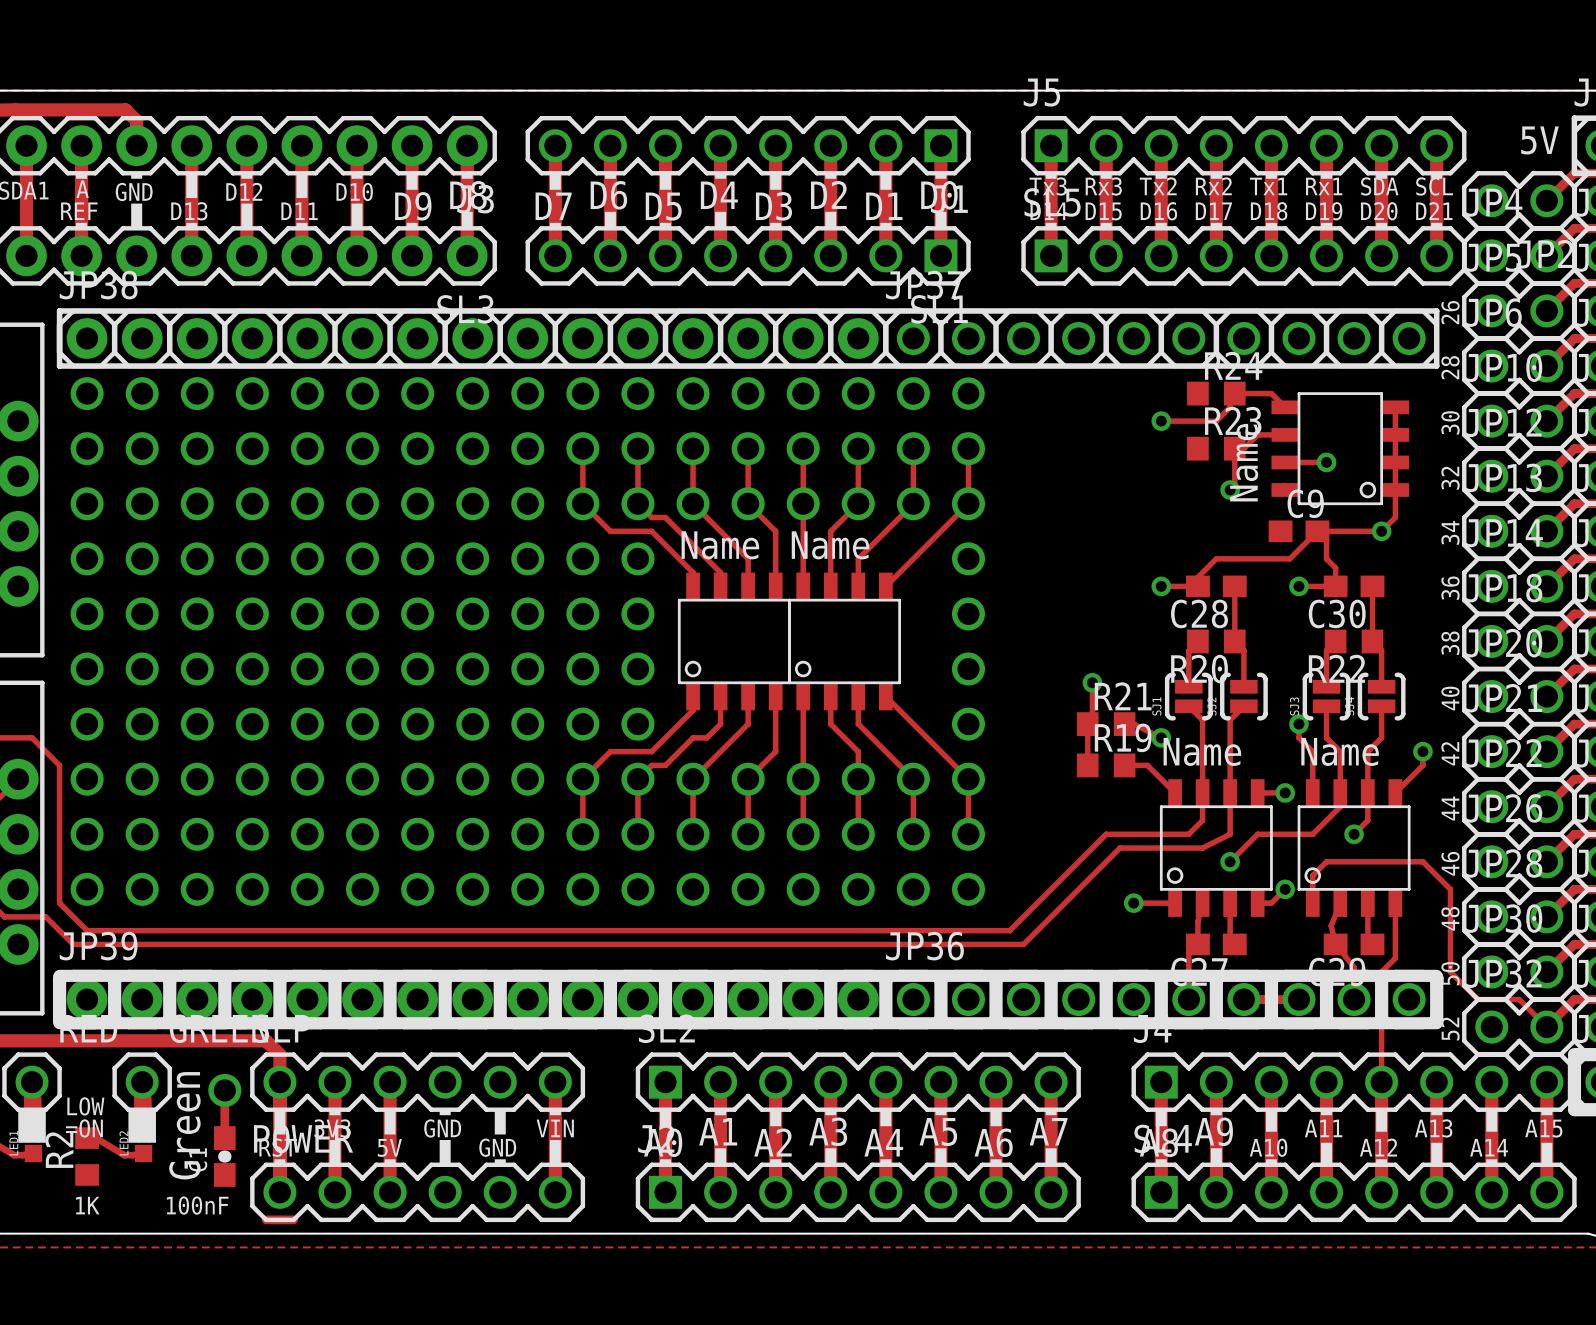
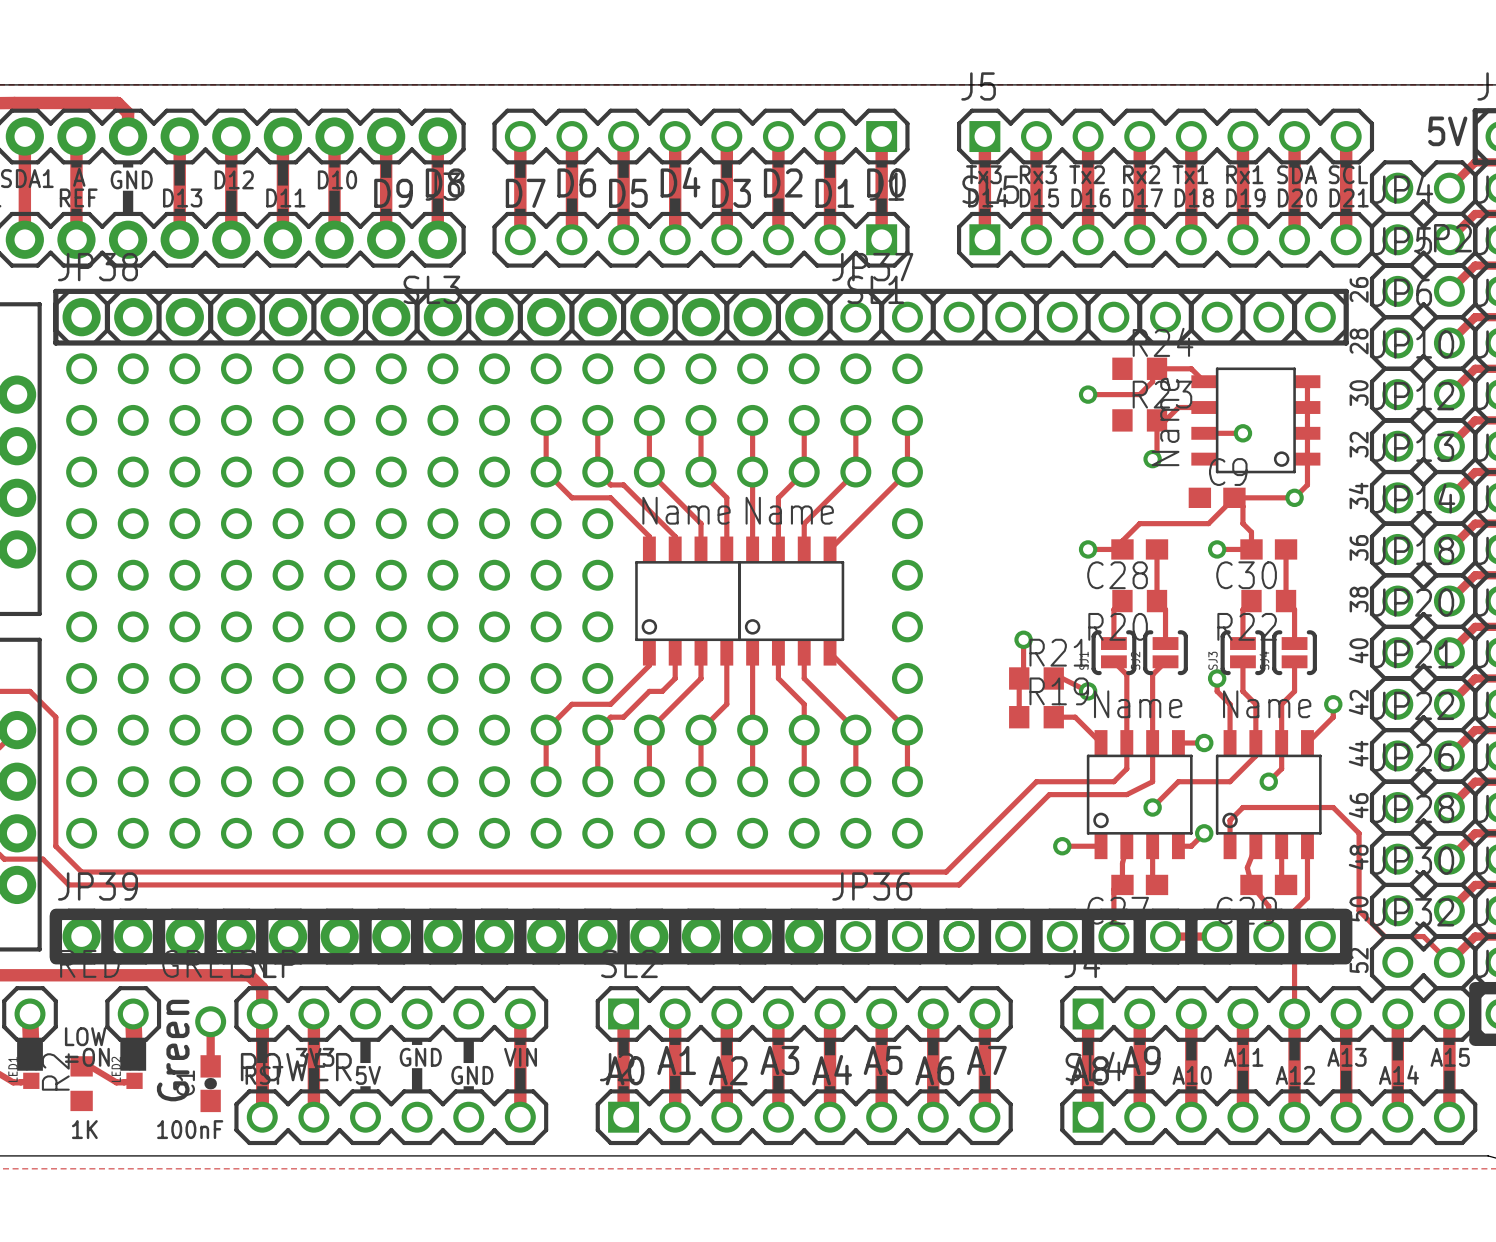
track: (390, 1082) (390, 1192) -> none
track: (266, 1219) (293, 1219) -> none

